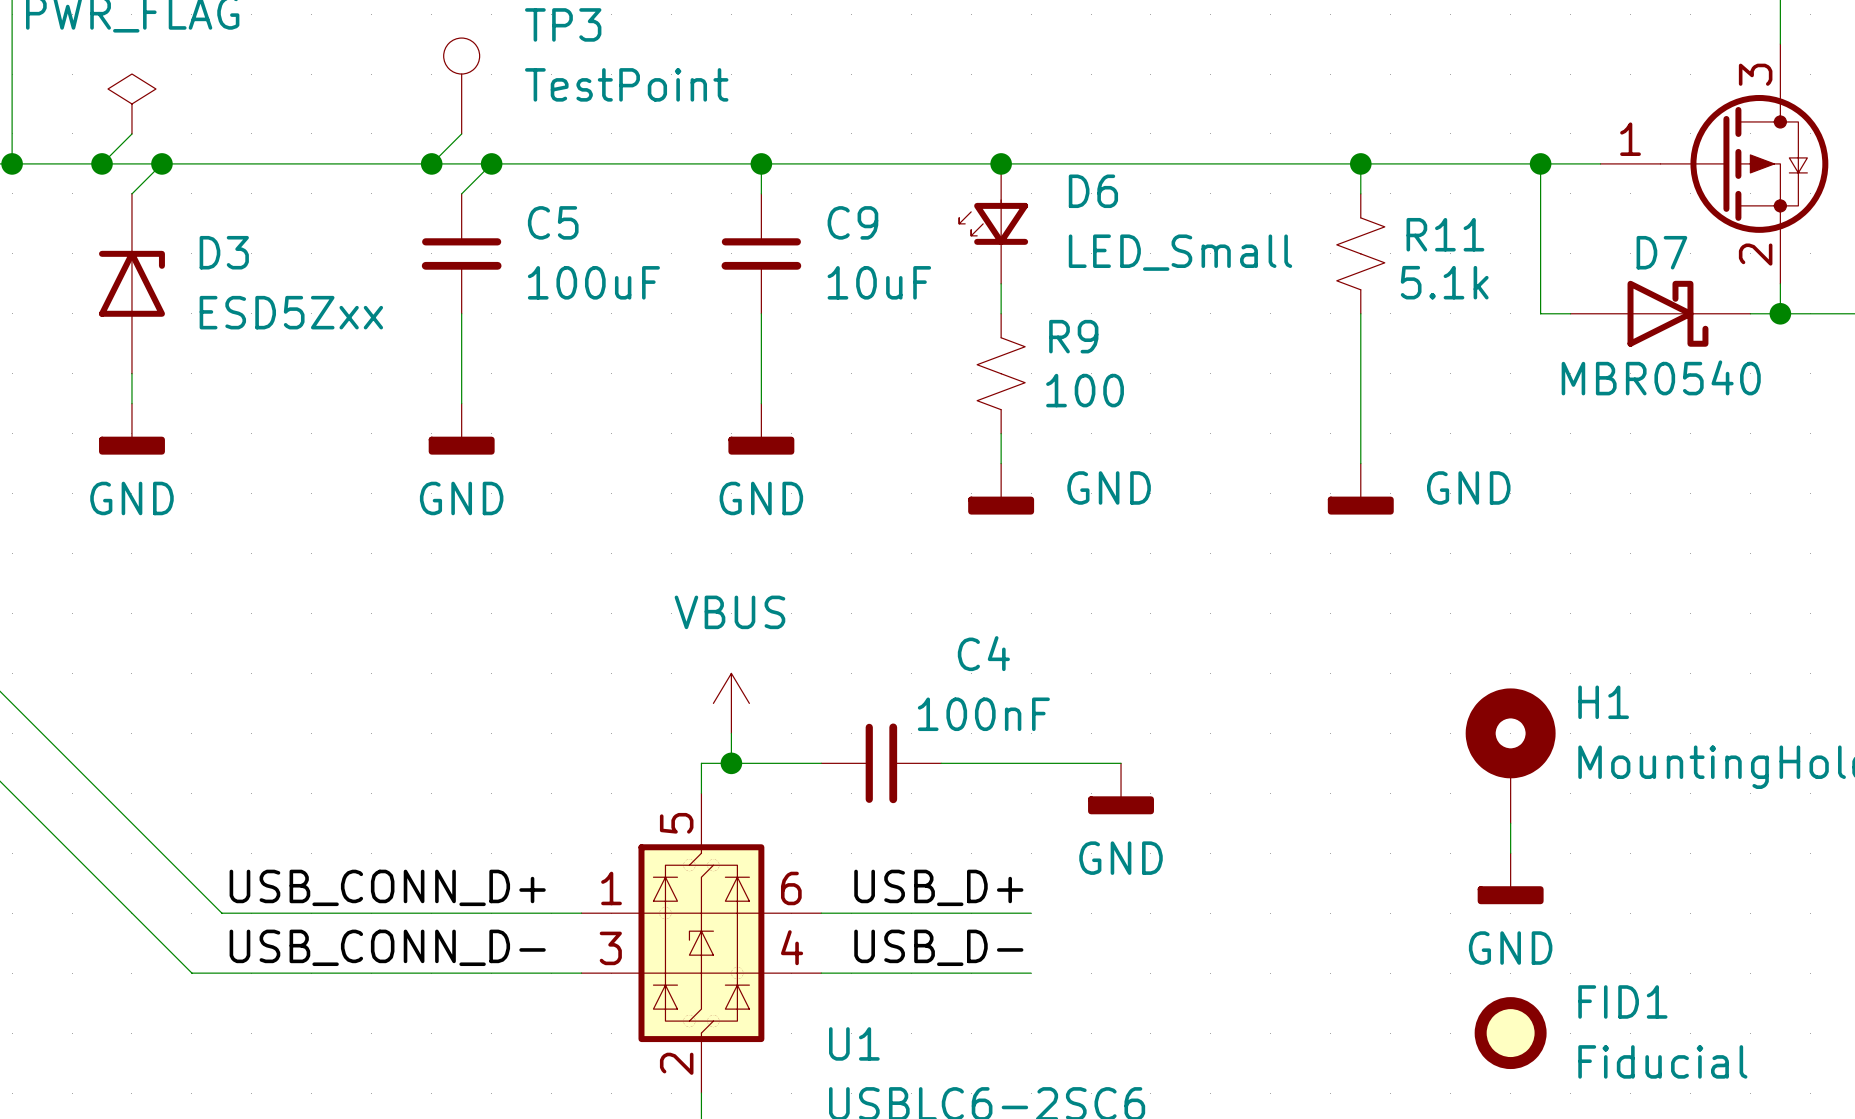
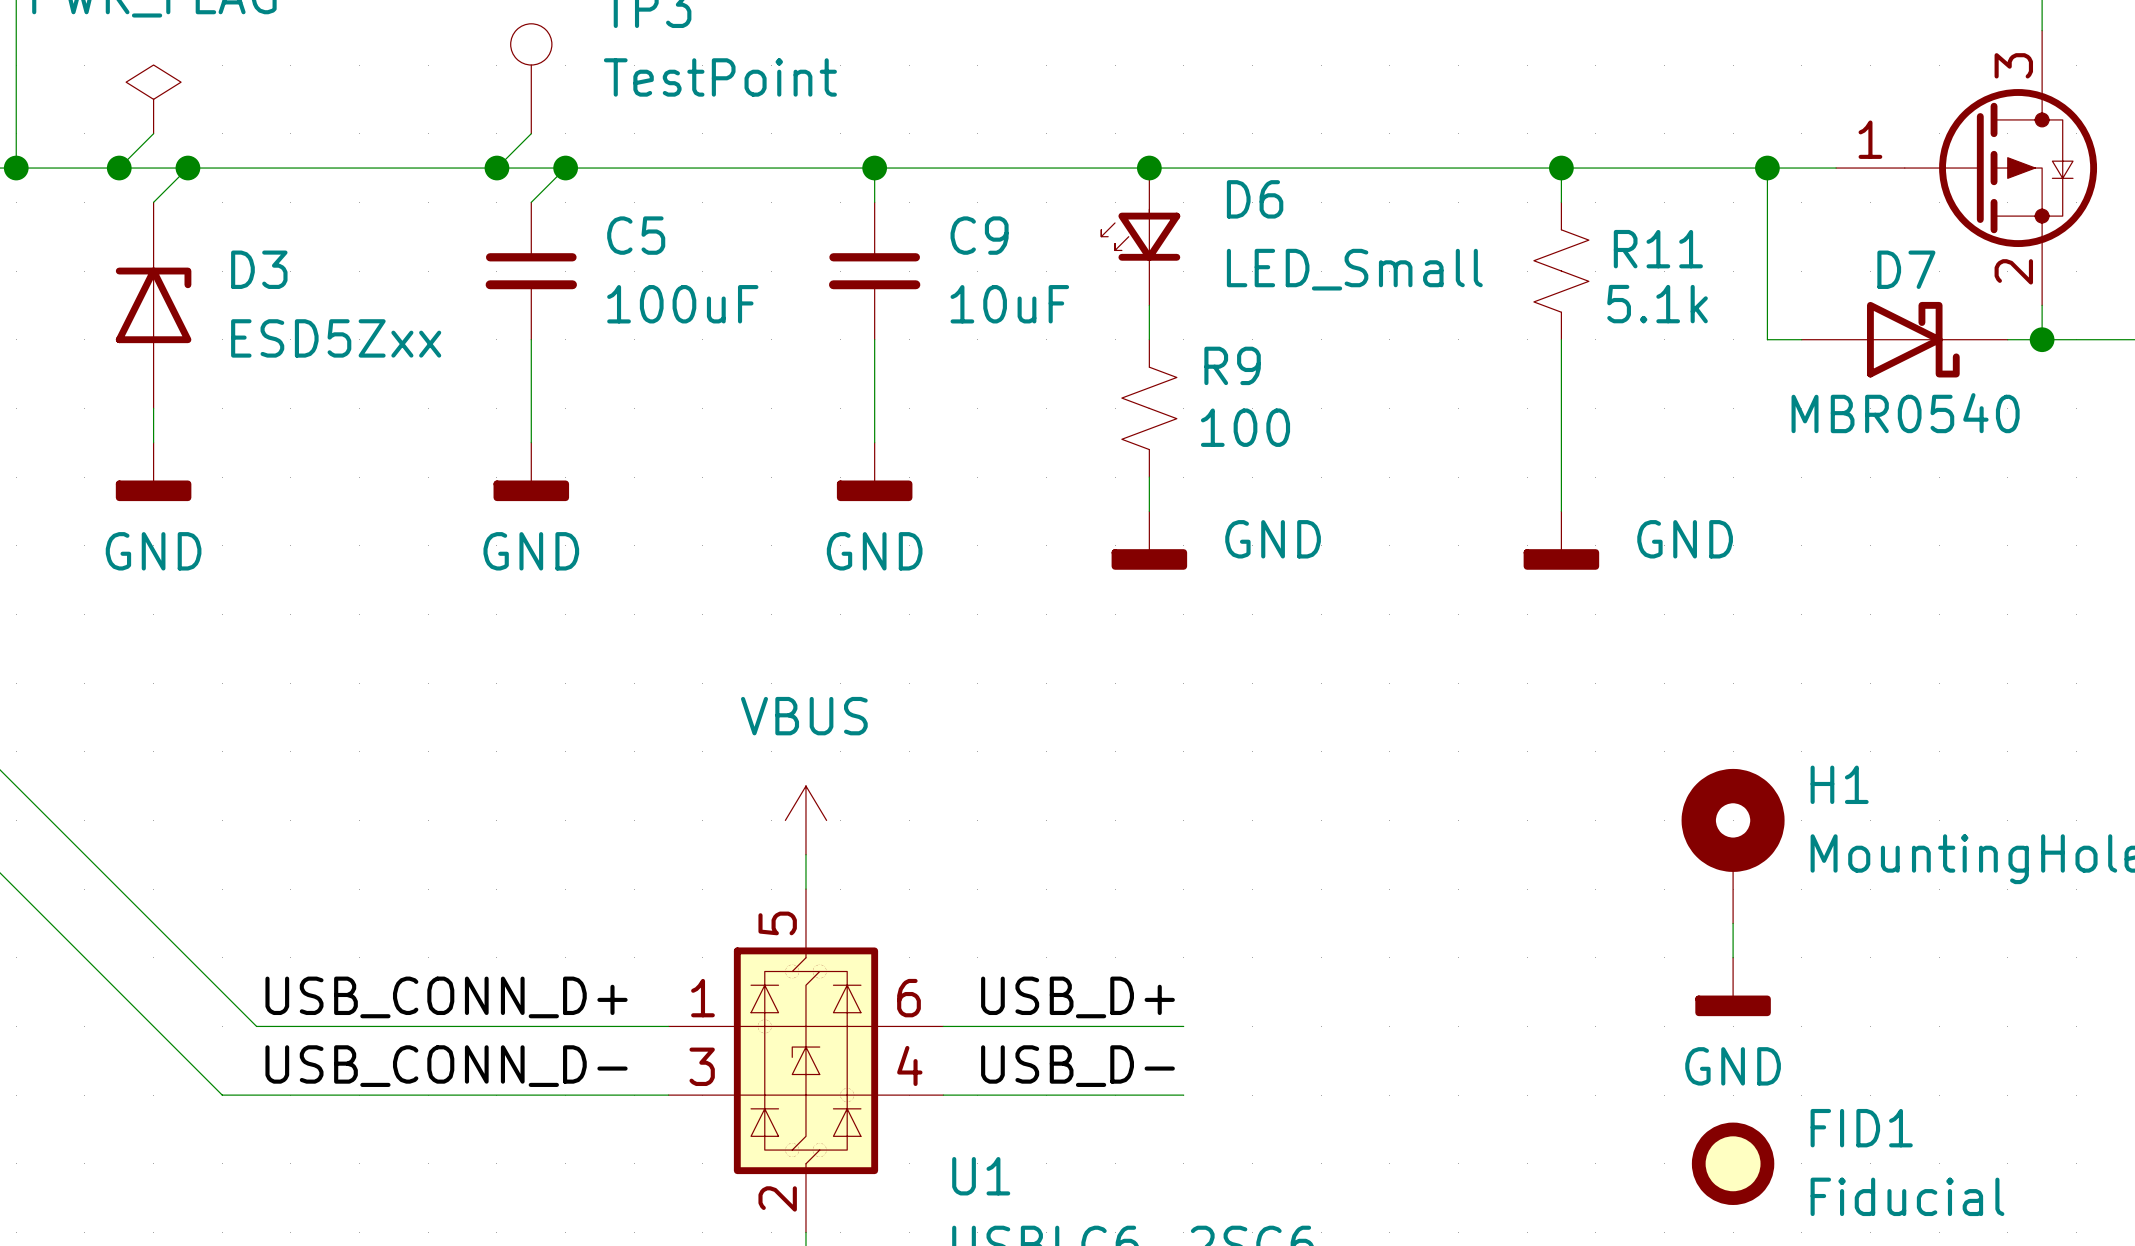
power symbol position: VBUS (731, 703) -> VBUS (805, 820)
wire: (731, 733) (731, 763) -> none
wire: (701, 763) (821, 763) -> none
junction: (731, 763) -> none
C4: 100nF (881, 763) -> none
wire: (941, 763) (1121, 763) -> none
power symbol: GND (1121, 788) -> none

